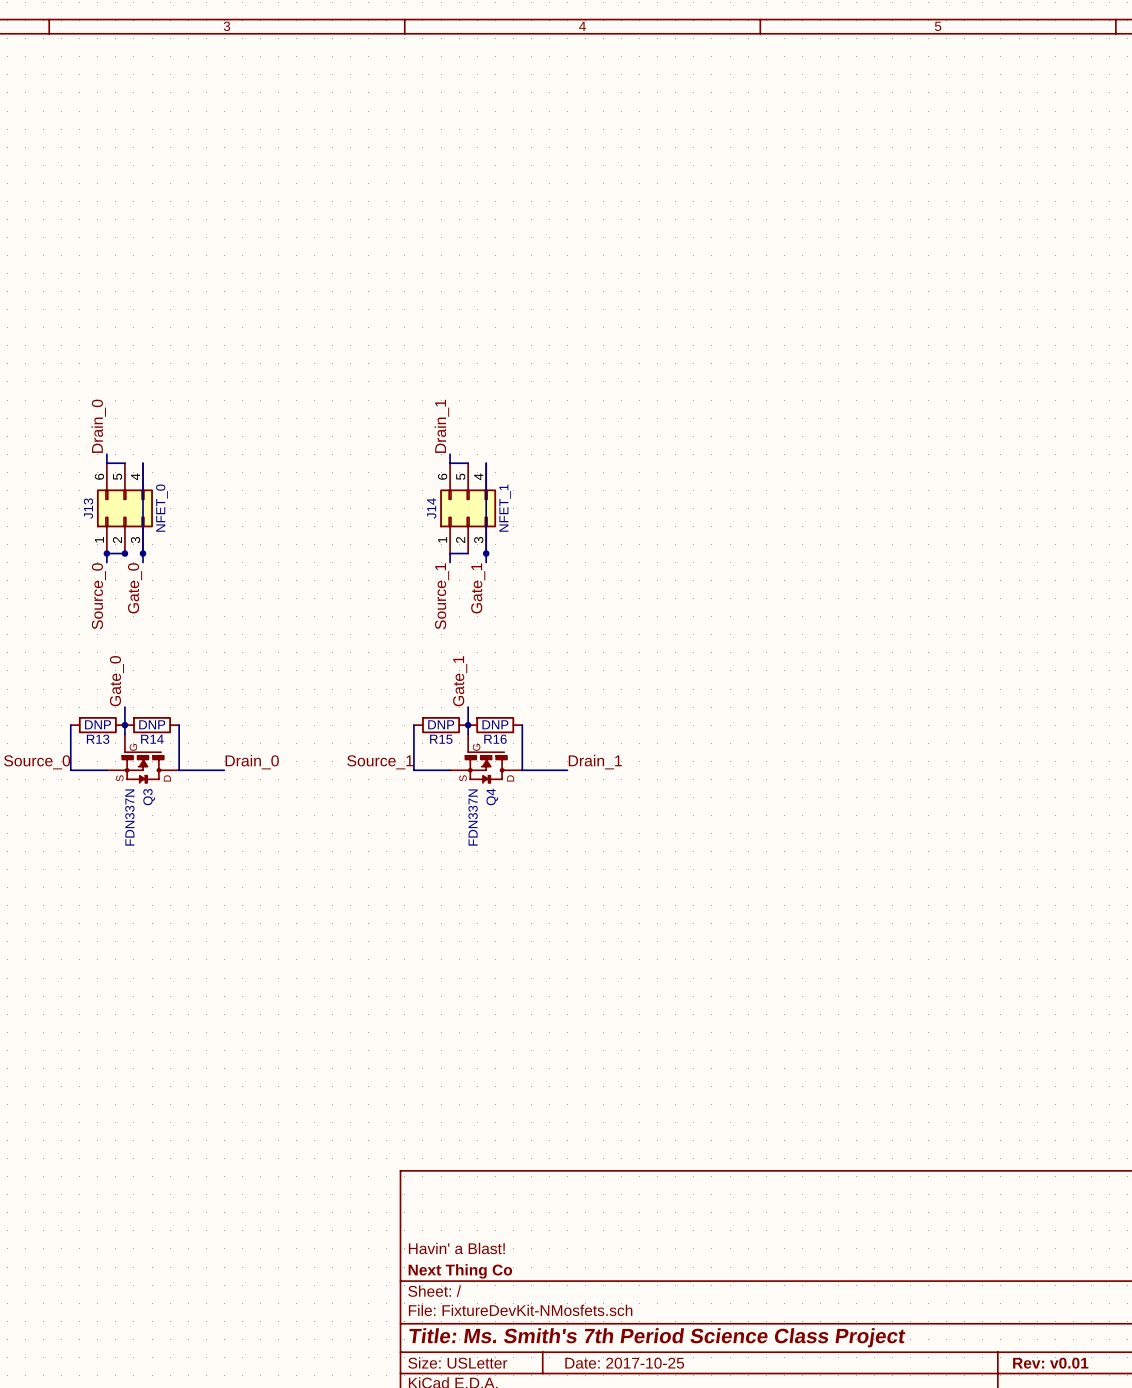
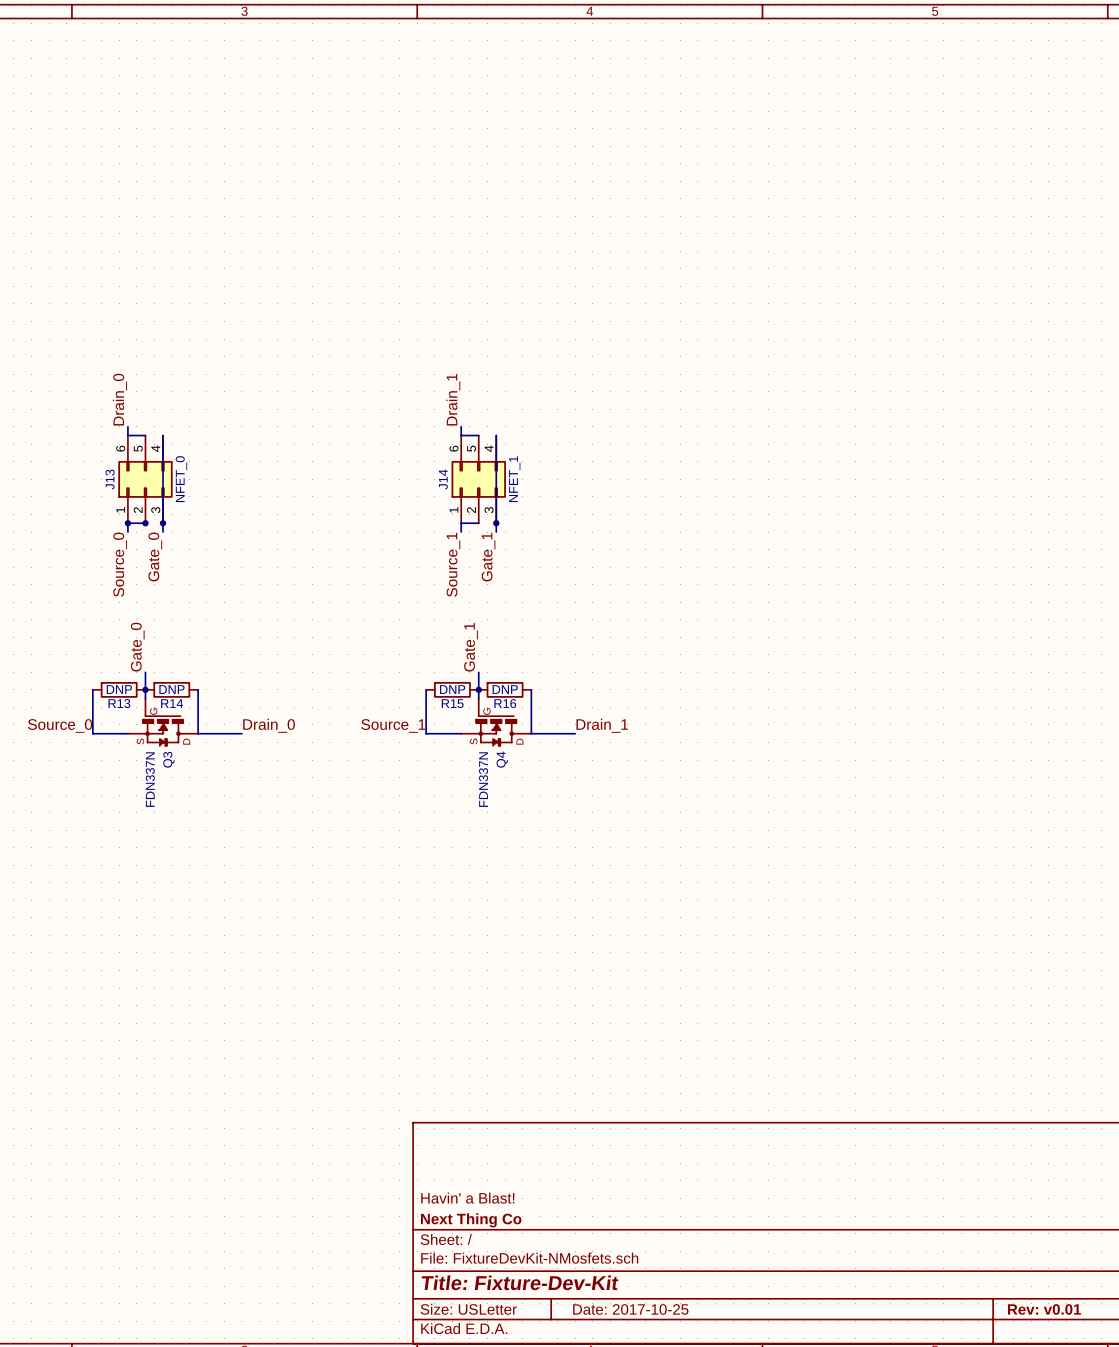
title block: Title: Ms. Smith's 7th Period Science Class Project (657, 1337) -> Title: Fixture-Dev-Kit (520, 1282)

